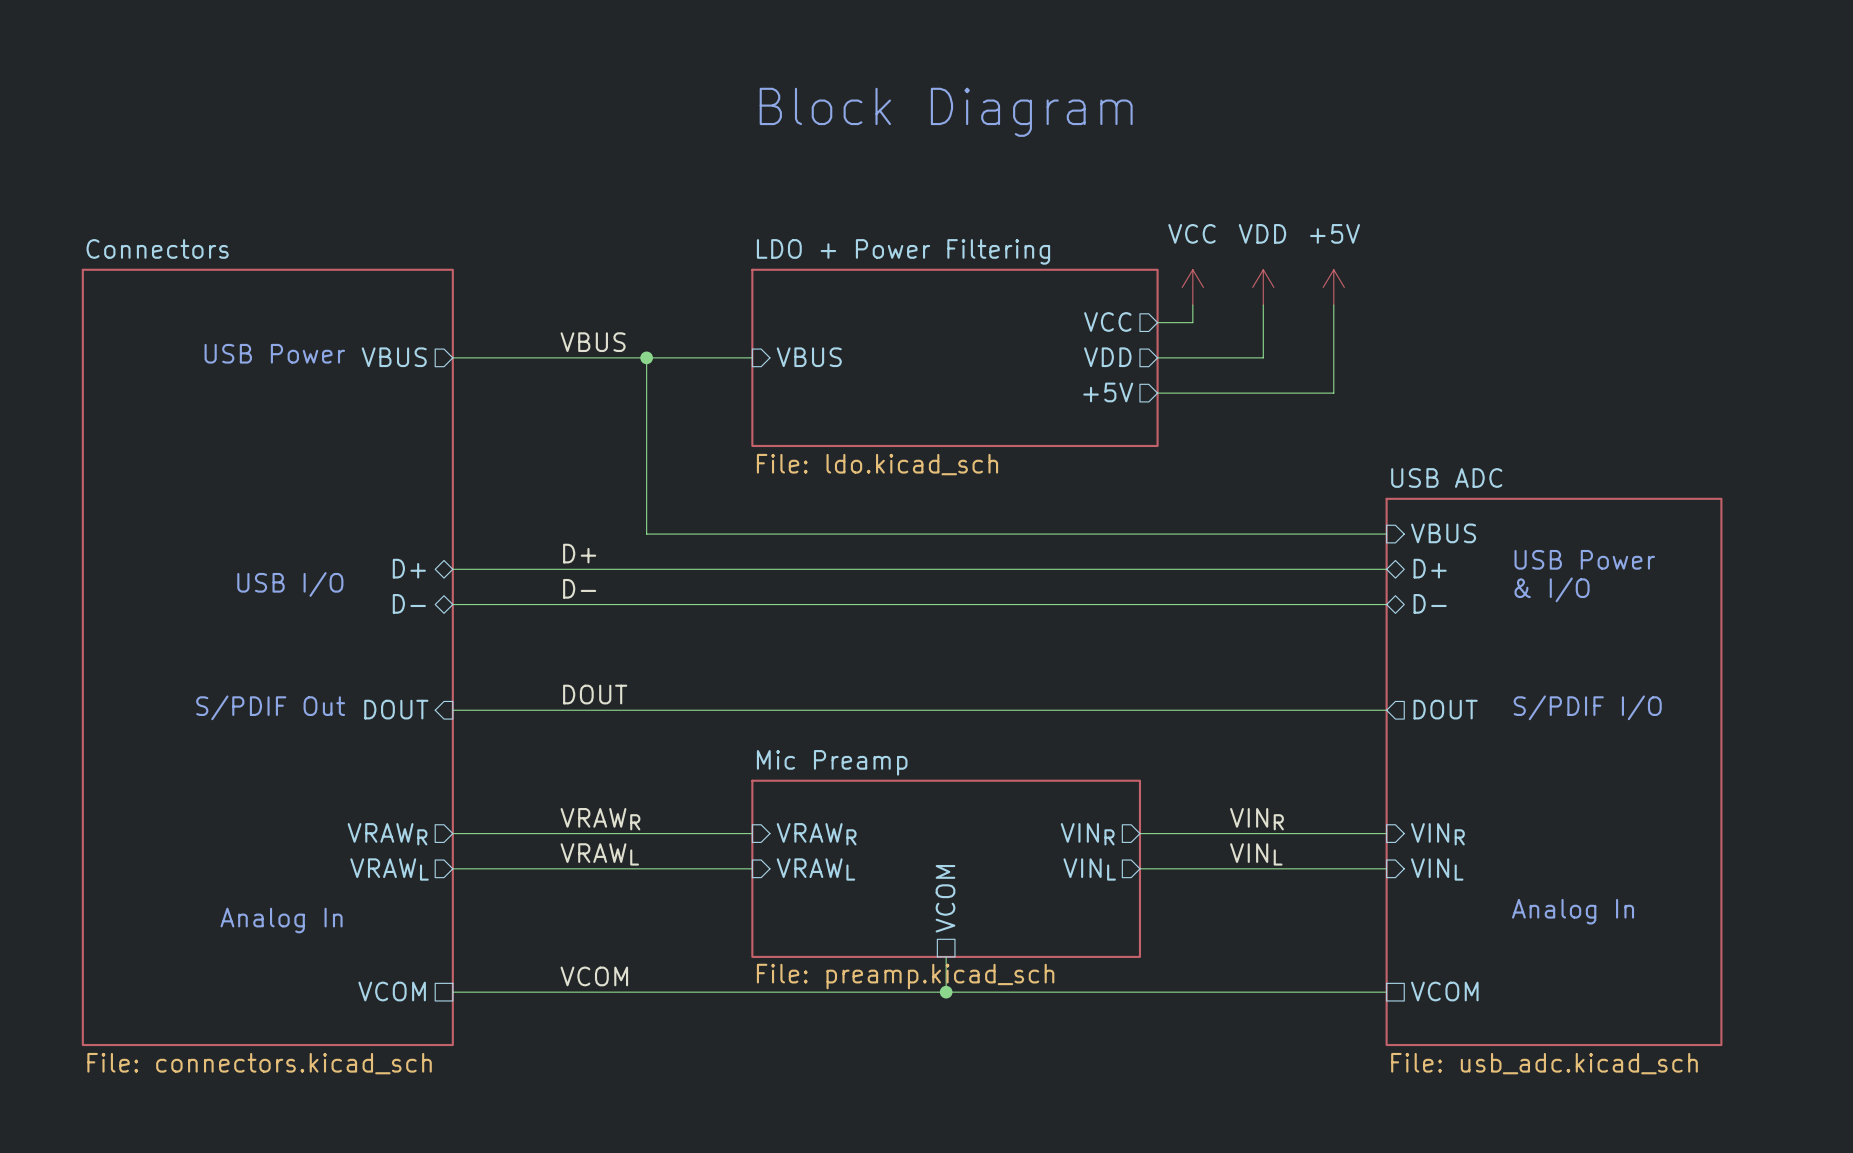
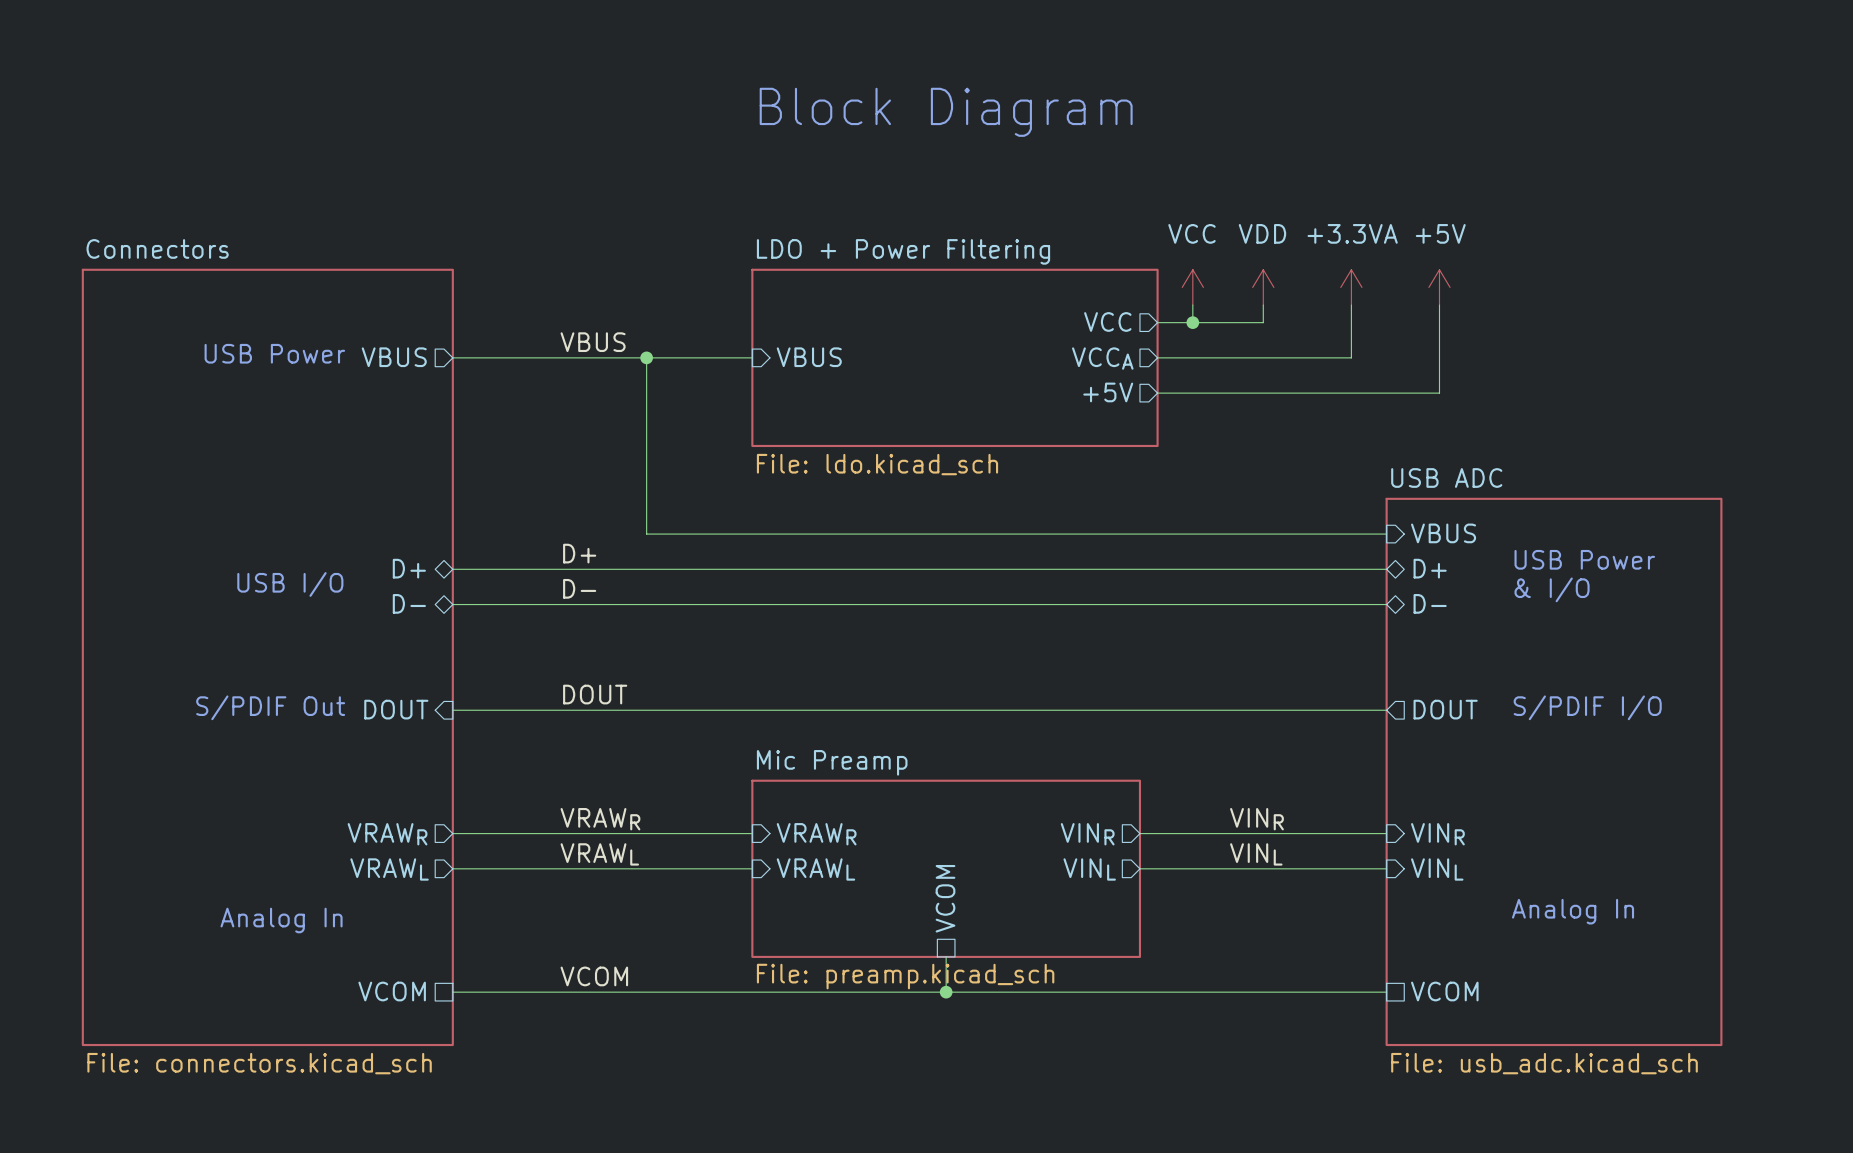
power symbol position: +5V (1333, 287) -> +5V (1439, 287)
power symbol: none -> +3.3VA (1351, 287)
wire: (1333, 305) (1333, 393) -> (1439, 305) (1439, 393) (1333, 393)
wire: none -> (1351, 305) (1351, 357) (1263, 357)
junction: none -> (1192, 322)
wire: (1263, 322) (1263, 357) -> (1263, 322) (1192, 322)
sheet pin: VDD (1107, 357) -> VCCA (1102, 358)

